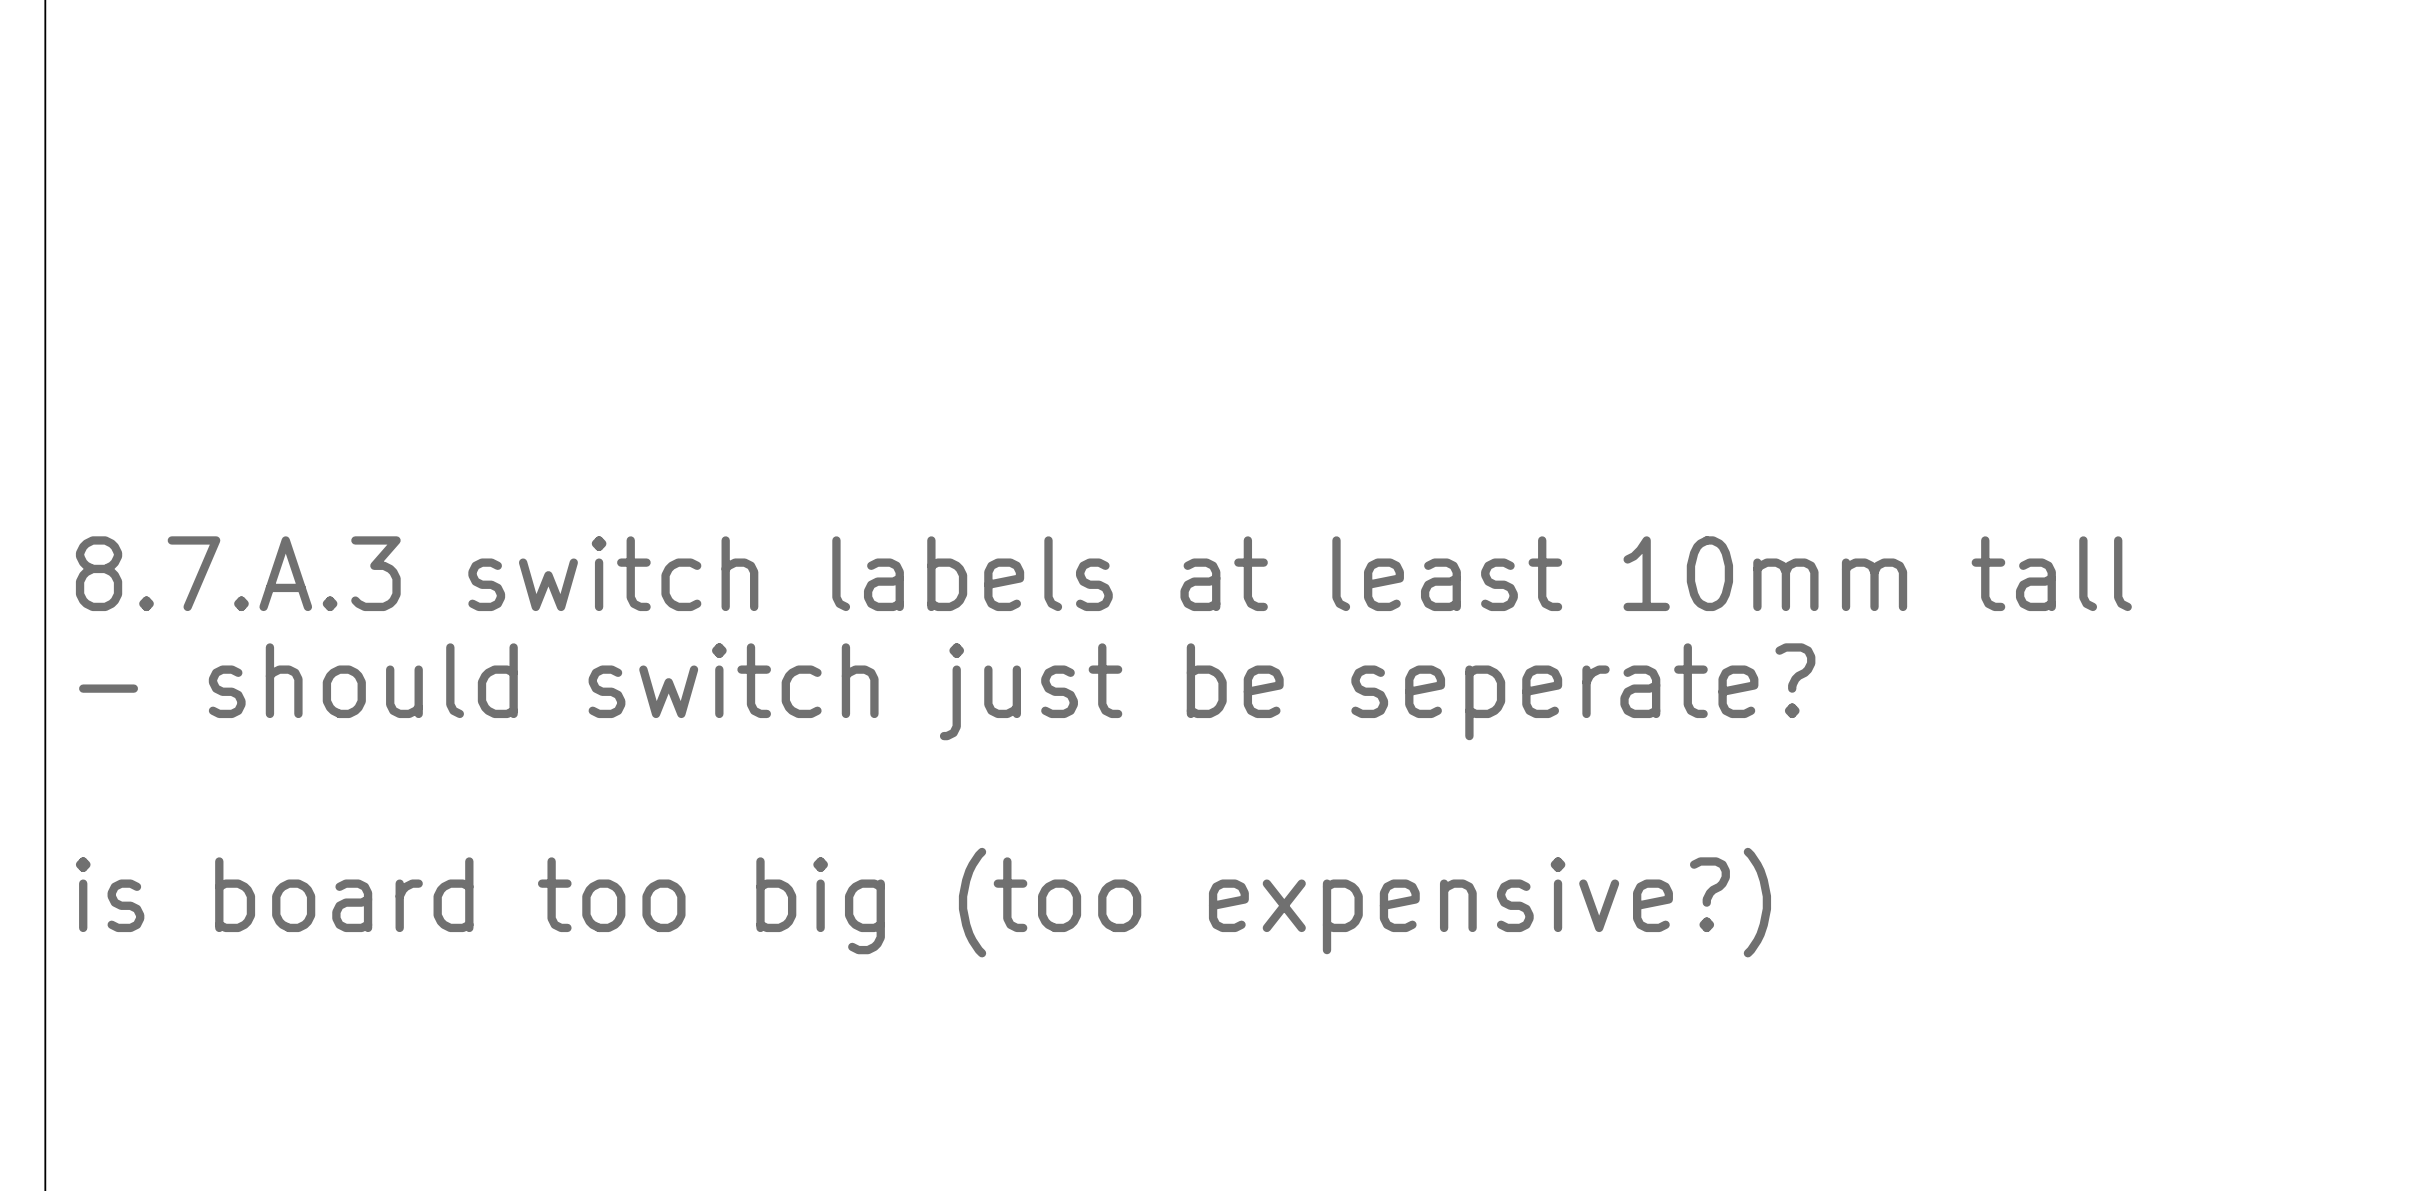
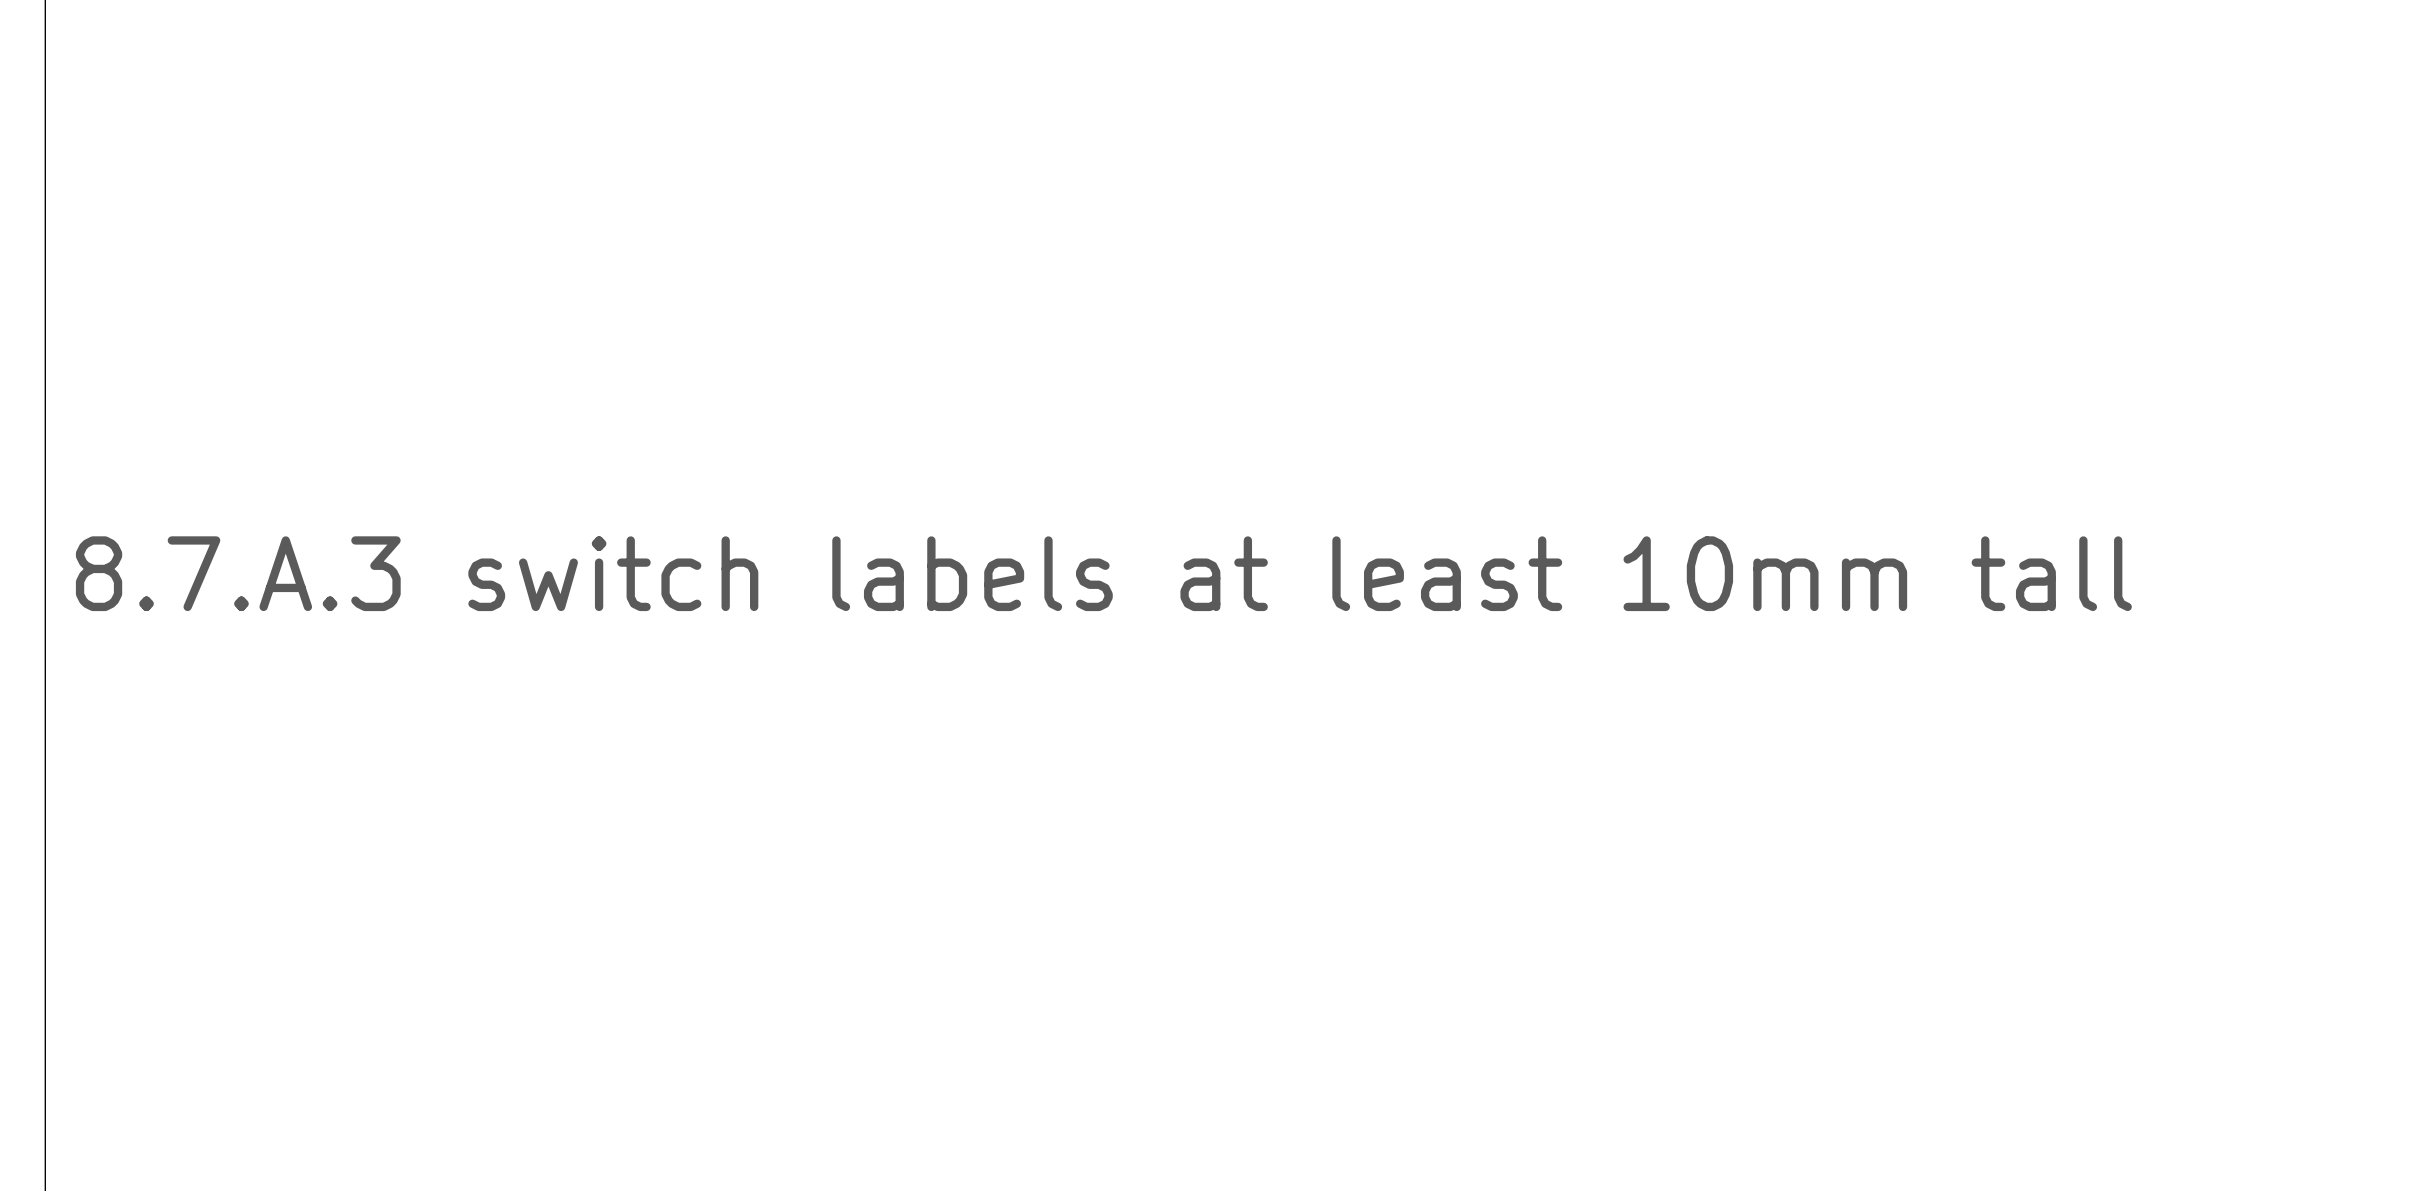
text: - should switch just be seperate? (947, 691) -> none
text: is board too big (too expensive?) (923, 902) -> none

